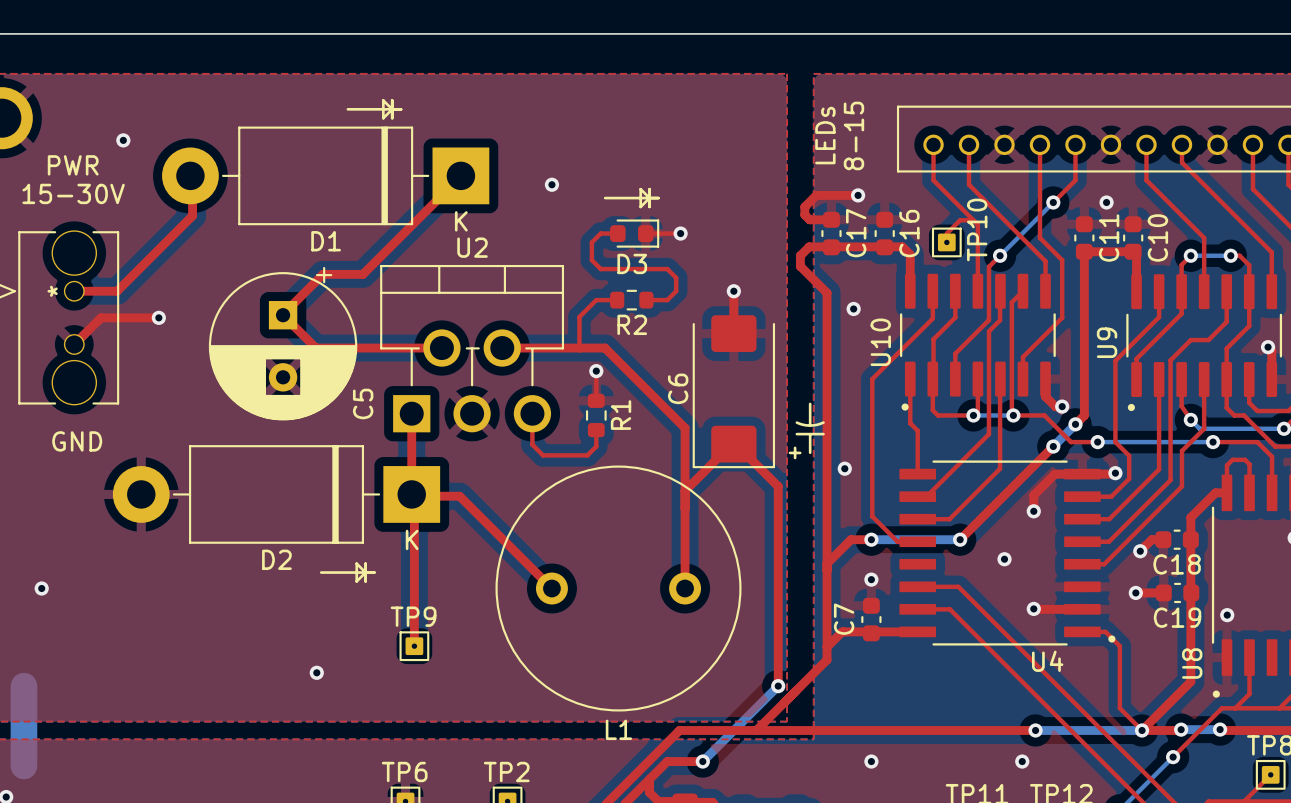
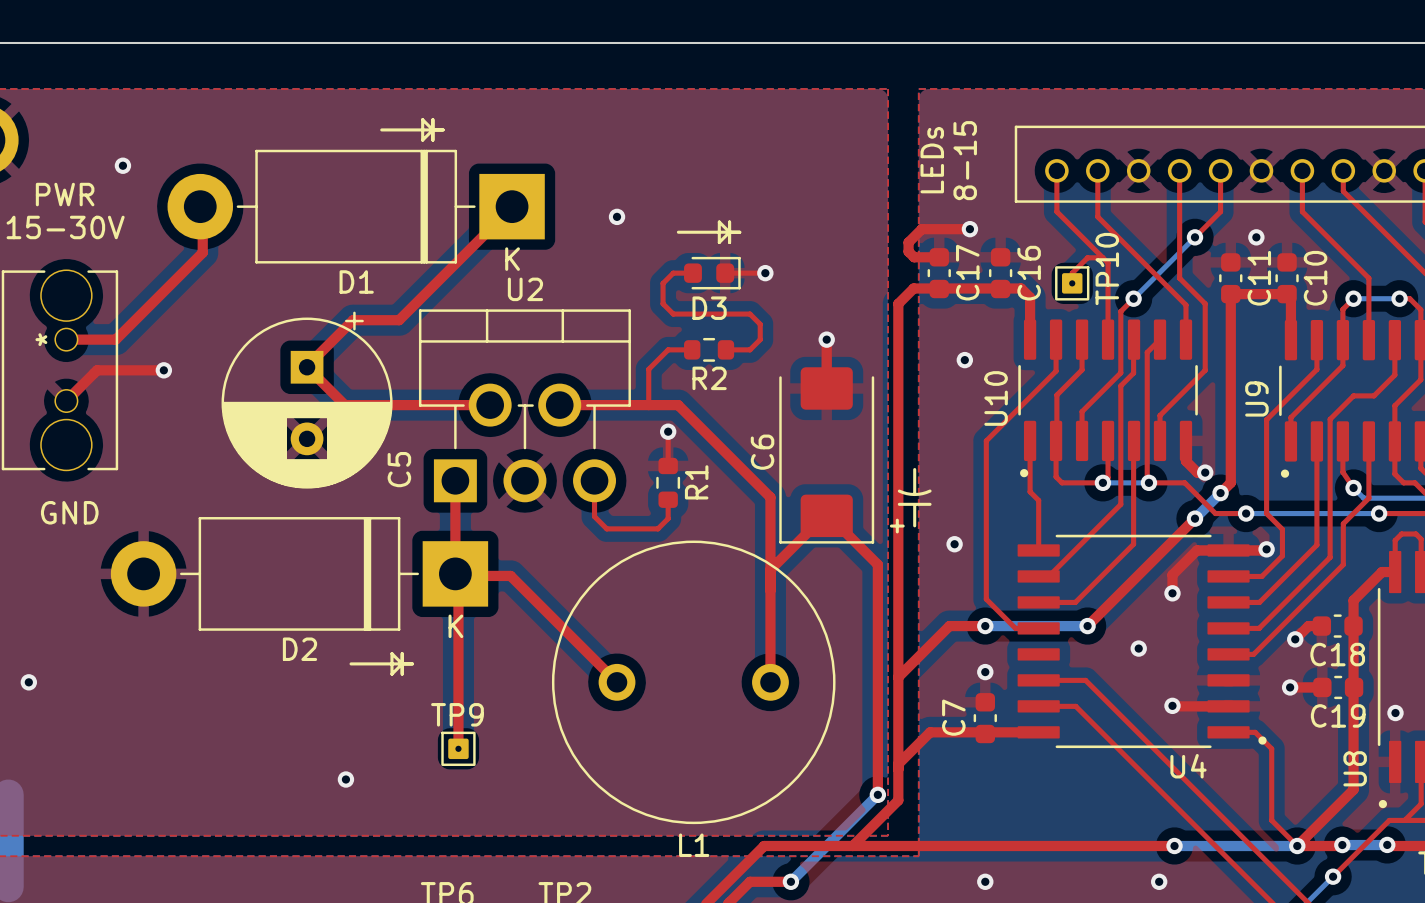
top track: (800, 255) (800, 266) (827, 293) (827, 659) (795, 690) -> (903, 298) (898, 303) (898, 800)
top track: (850, 539) (827, 563) -> (961, 626) (949, 626) (898, 677)
top track: (842, 631) (827, 647) -> (951, 732) (930, 732) (898, 764)

